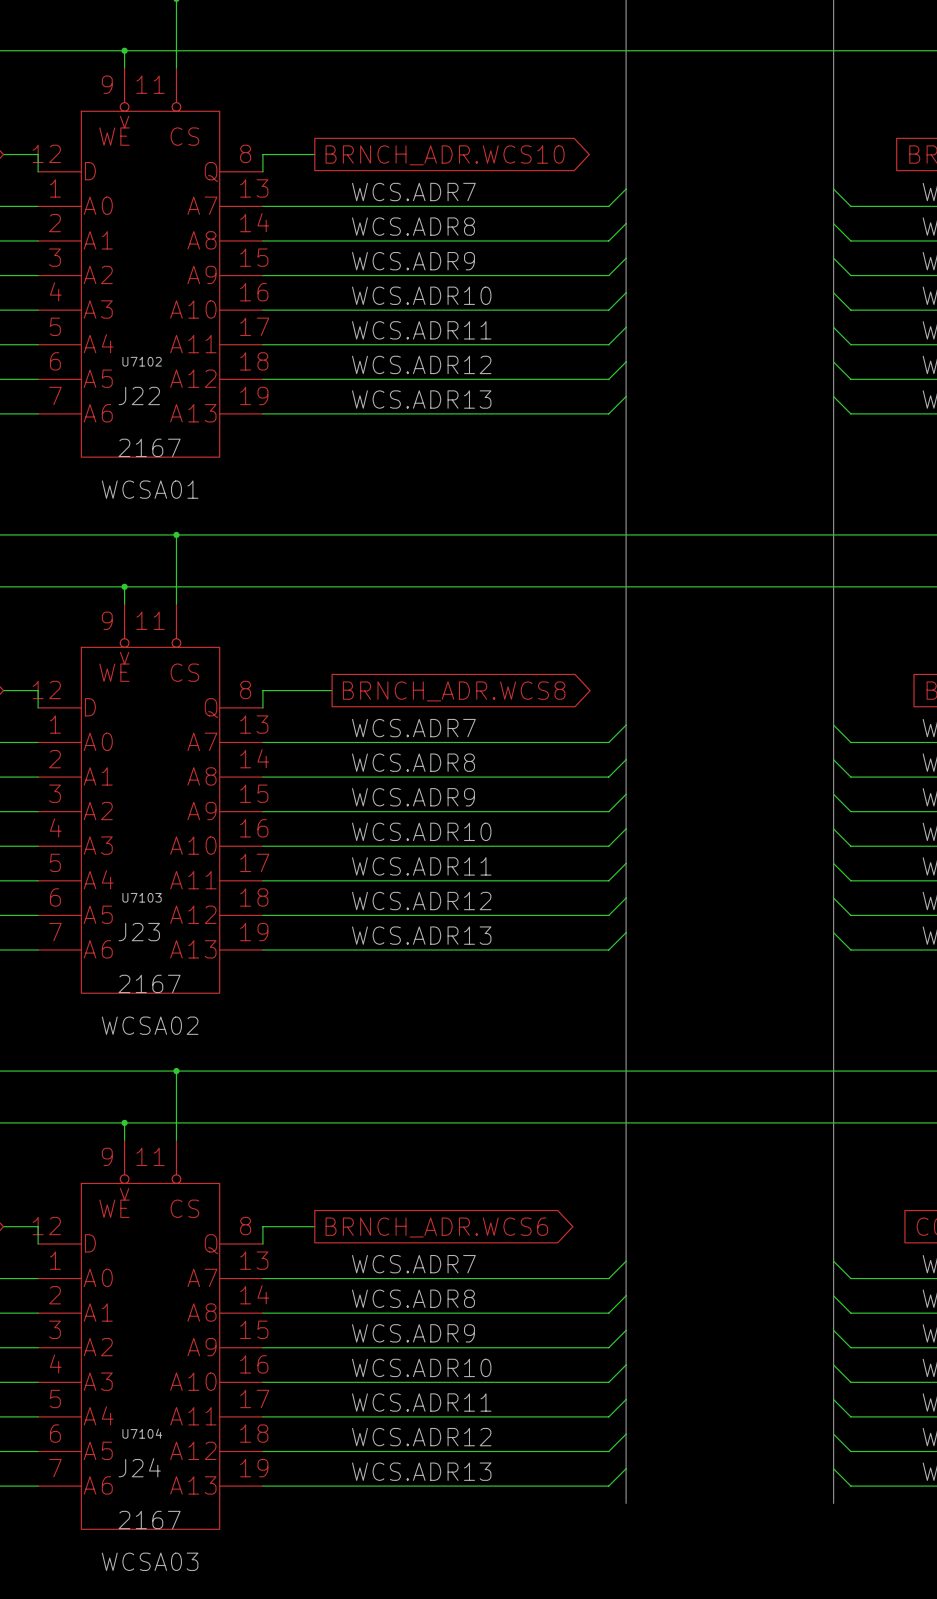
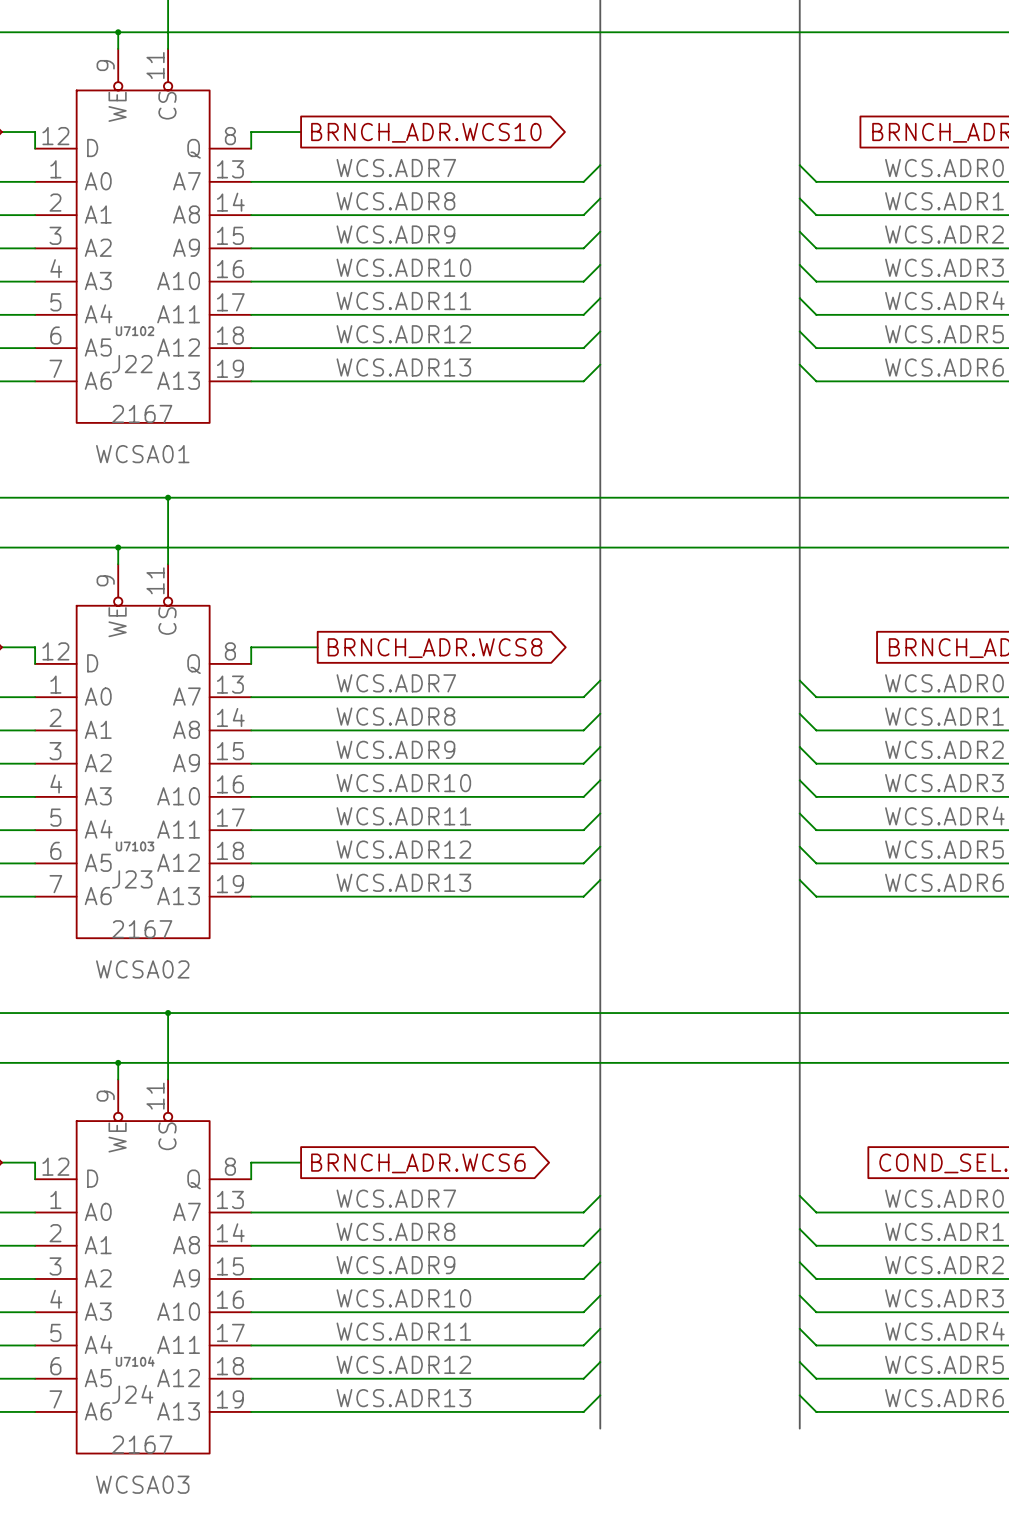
U7102 symbol: [38, 68, 263, 458] -> [35, 48, 252, 423]
U7103 symbol: [38, 604, 263, 994] -> [35, 564, 252, 939]
U7104 symbol: [38, 1140, 263, 1530] -> [35, 1079, 252, 1454]

